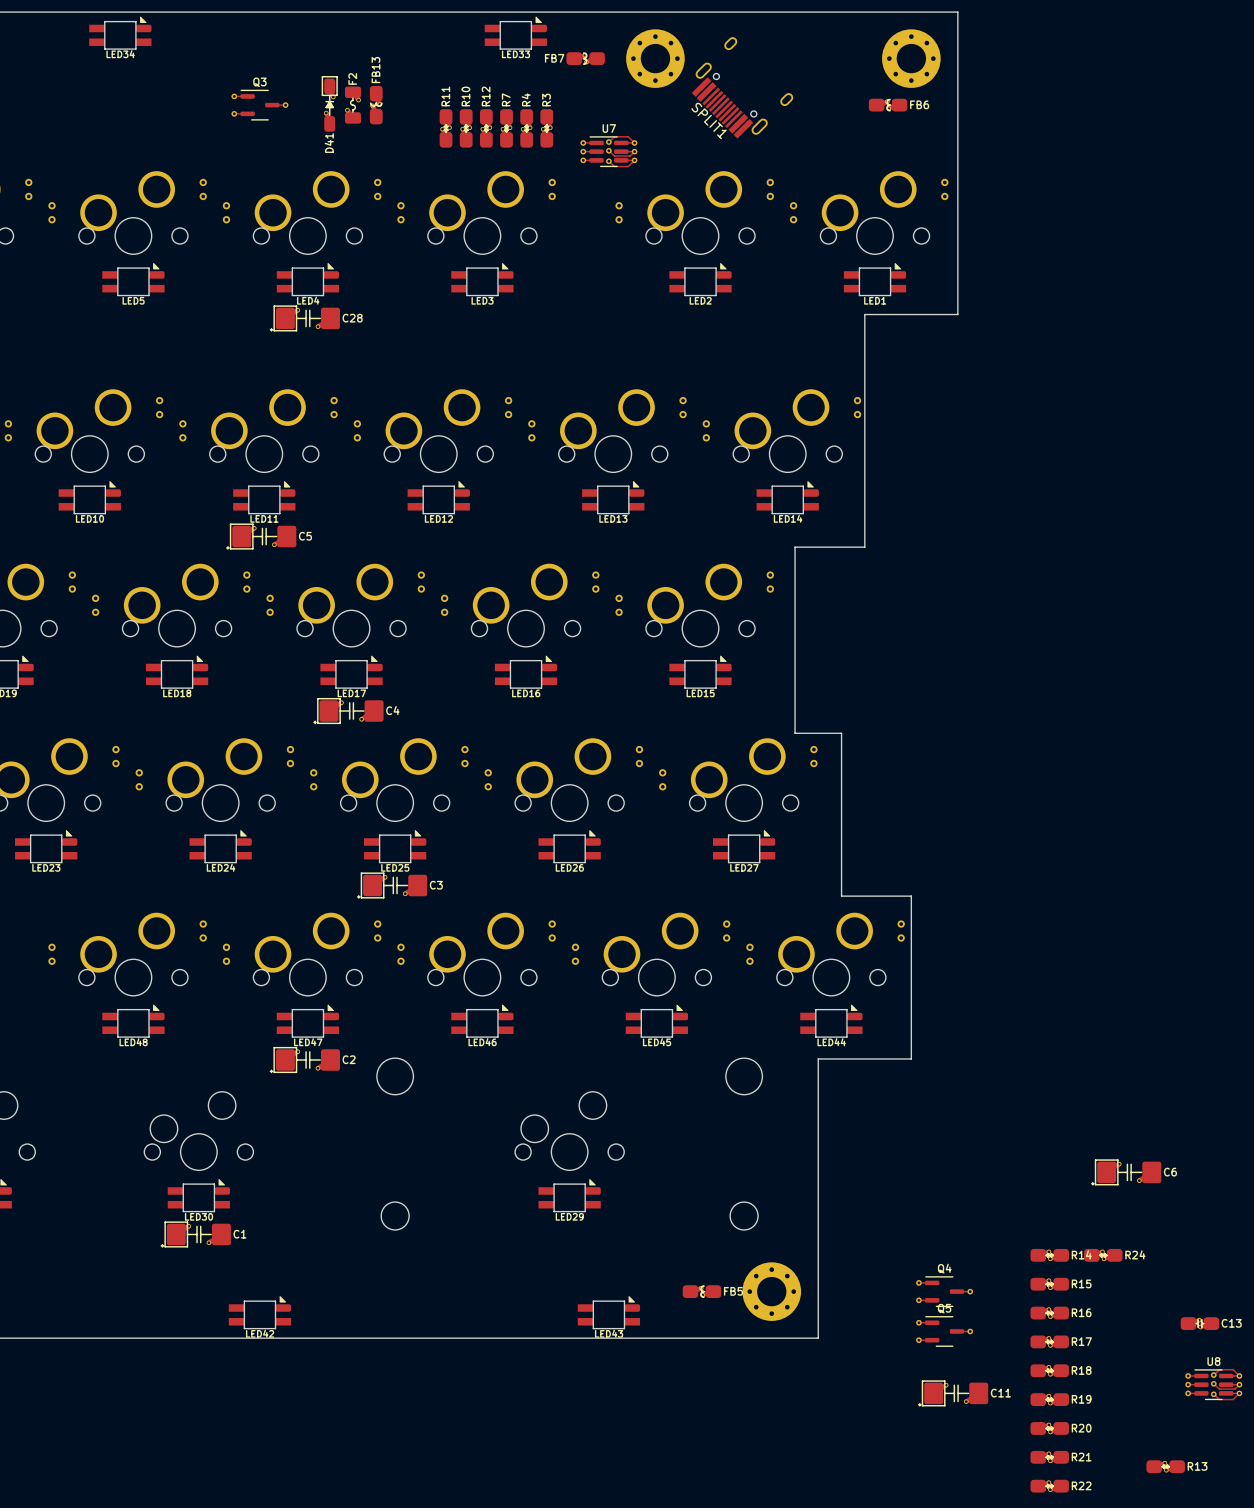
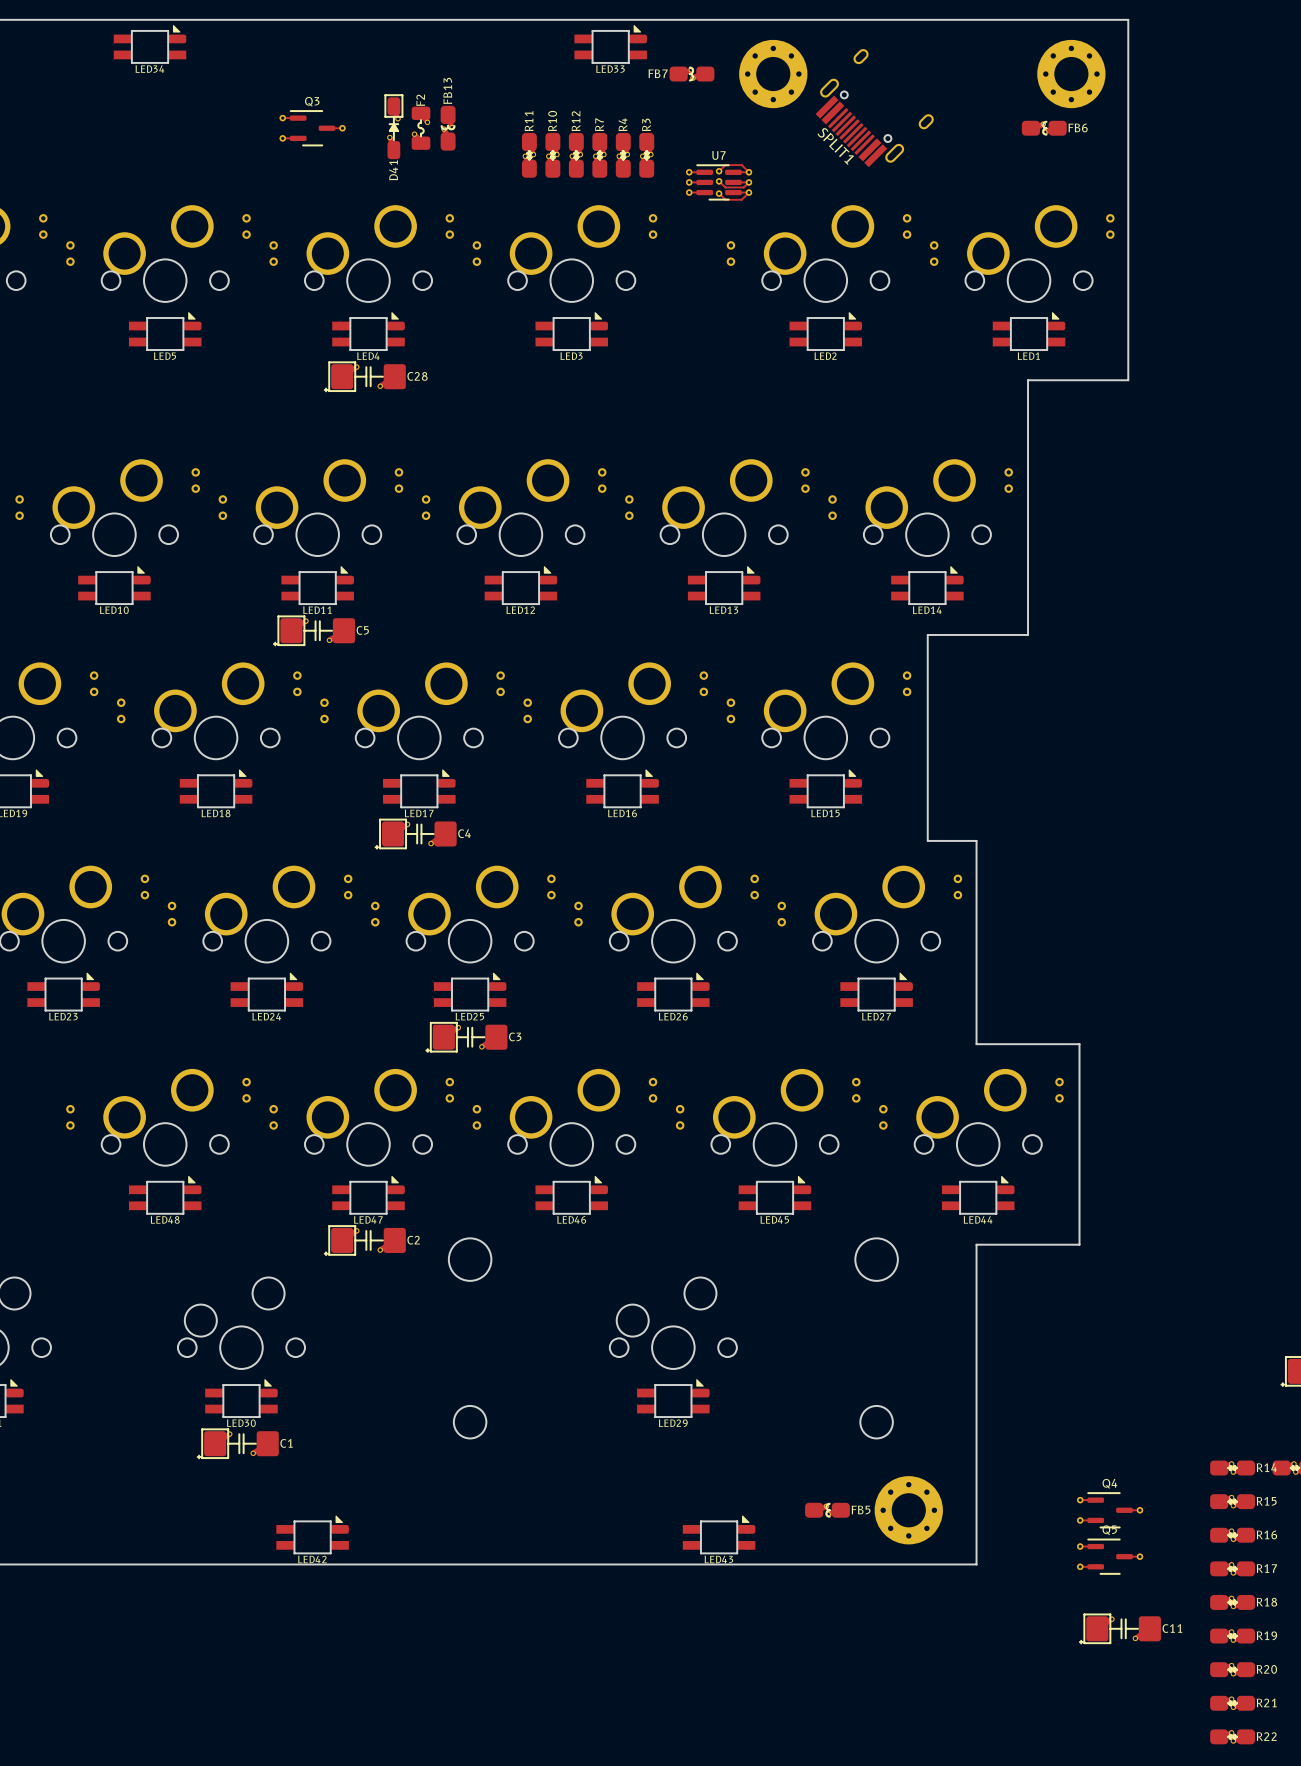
board edge: (957, 12) (957, 314) (864, 314) (864, 547) (795, 547) (795, 733) (841, 733) (841, 896) (911, 896) (911, 1058) (818, 1058) (818, 1338) -> (1125, 19) (1128, 19) (1128, 380) (1028, 380) (1028, 634) (927, 634) (927, 840) (976, 840) (976, 1044) (1079, 1044) (1079, 1244) (976, 1244) (976, 1564) (962, 1564)

